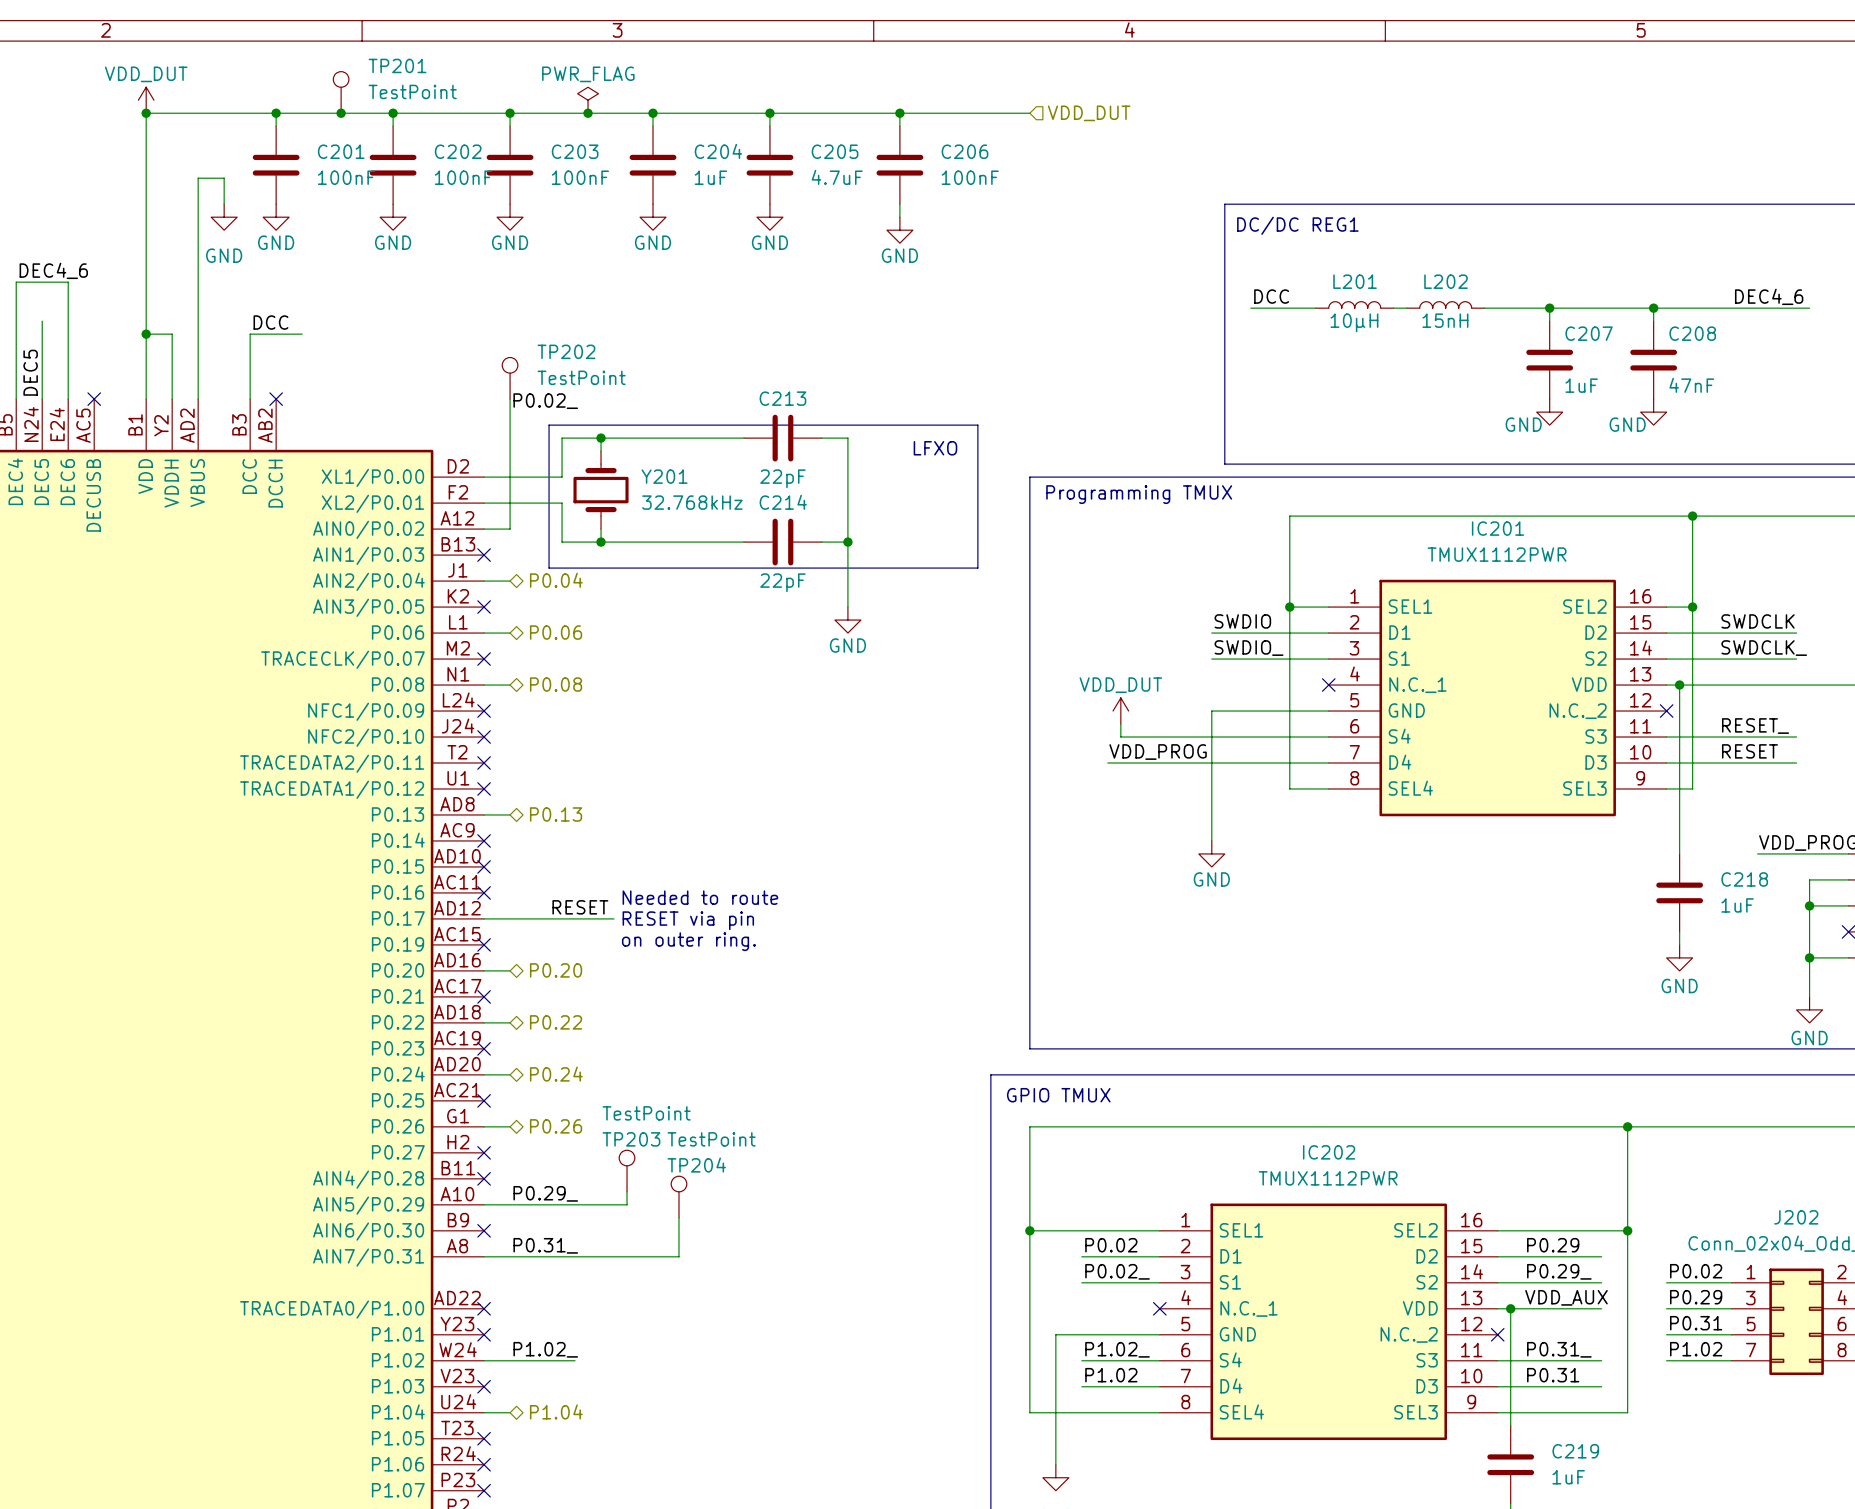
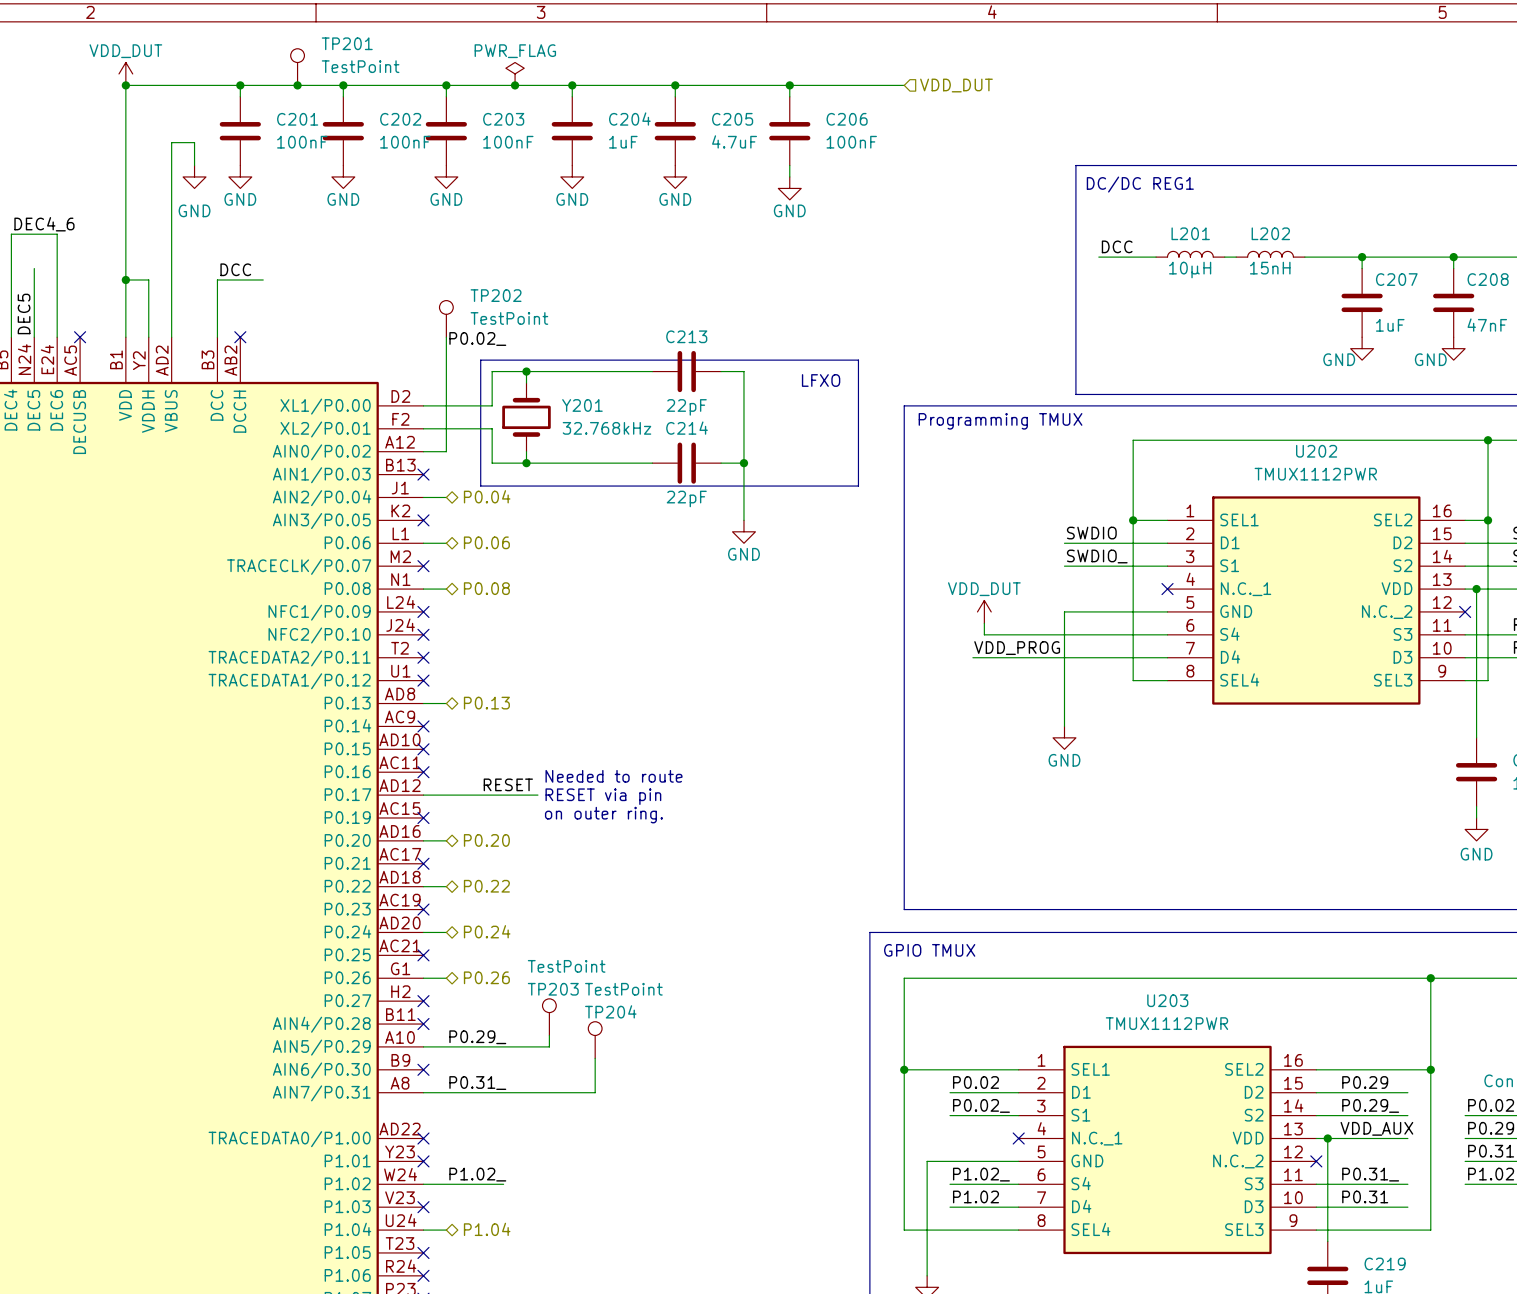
IC201 name: IC201 (1498, 528) -> U202 (1316, 451)
IC202 name: IC202 (1329, 1152) -> U203 (1167, 1000)

